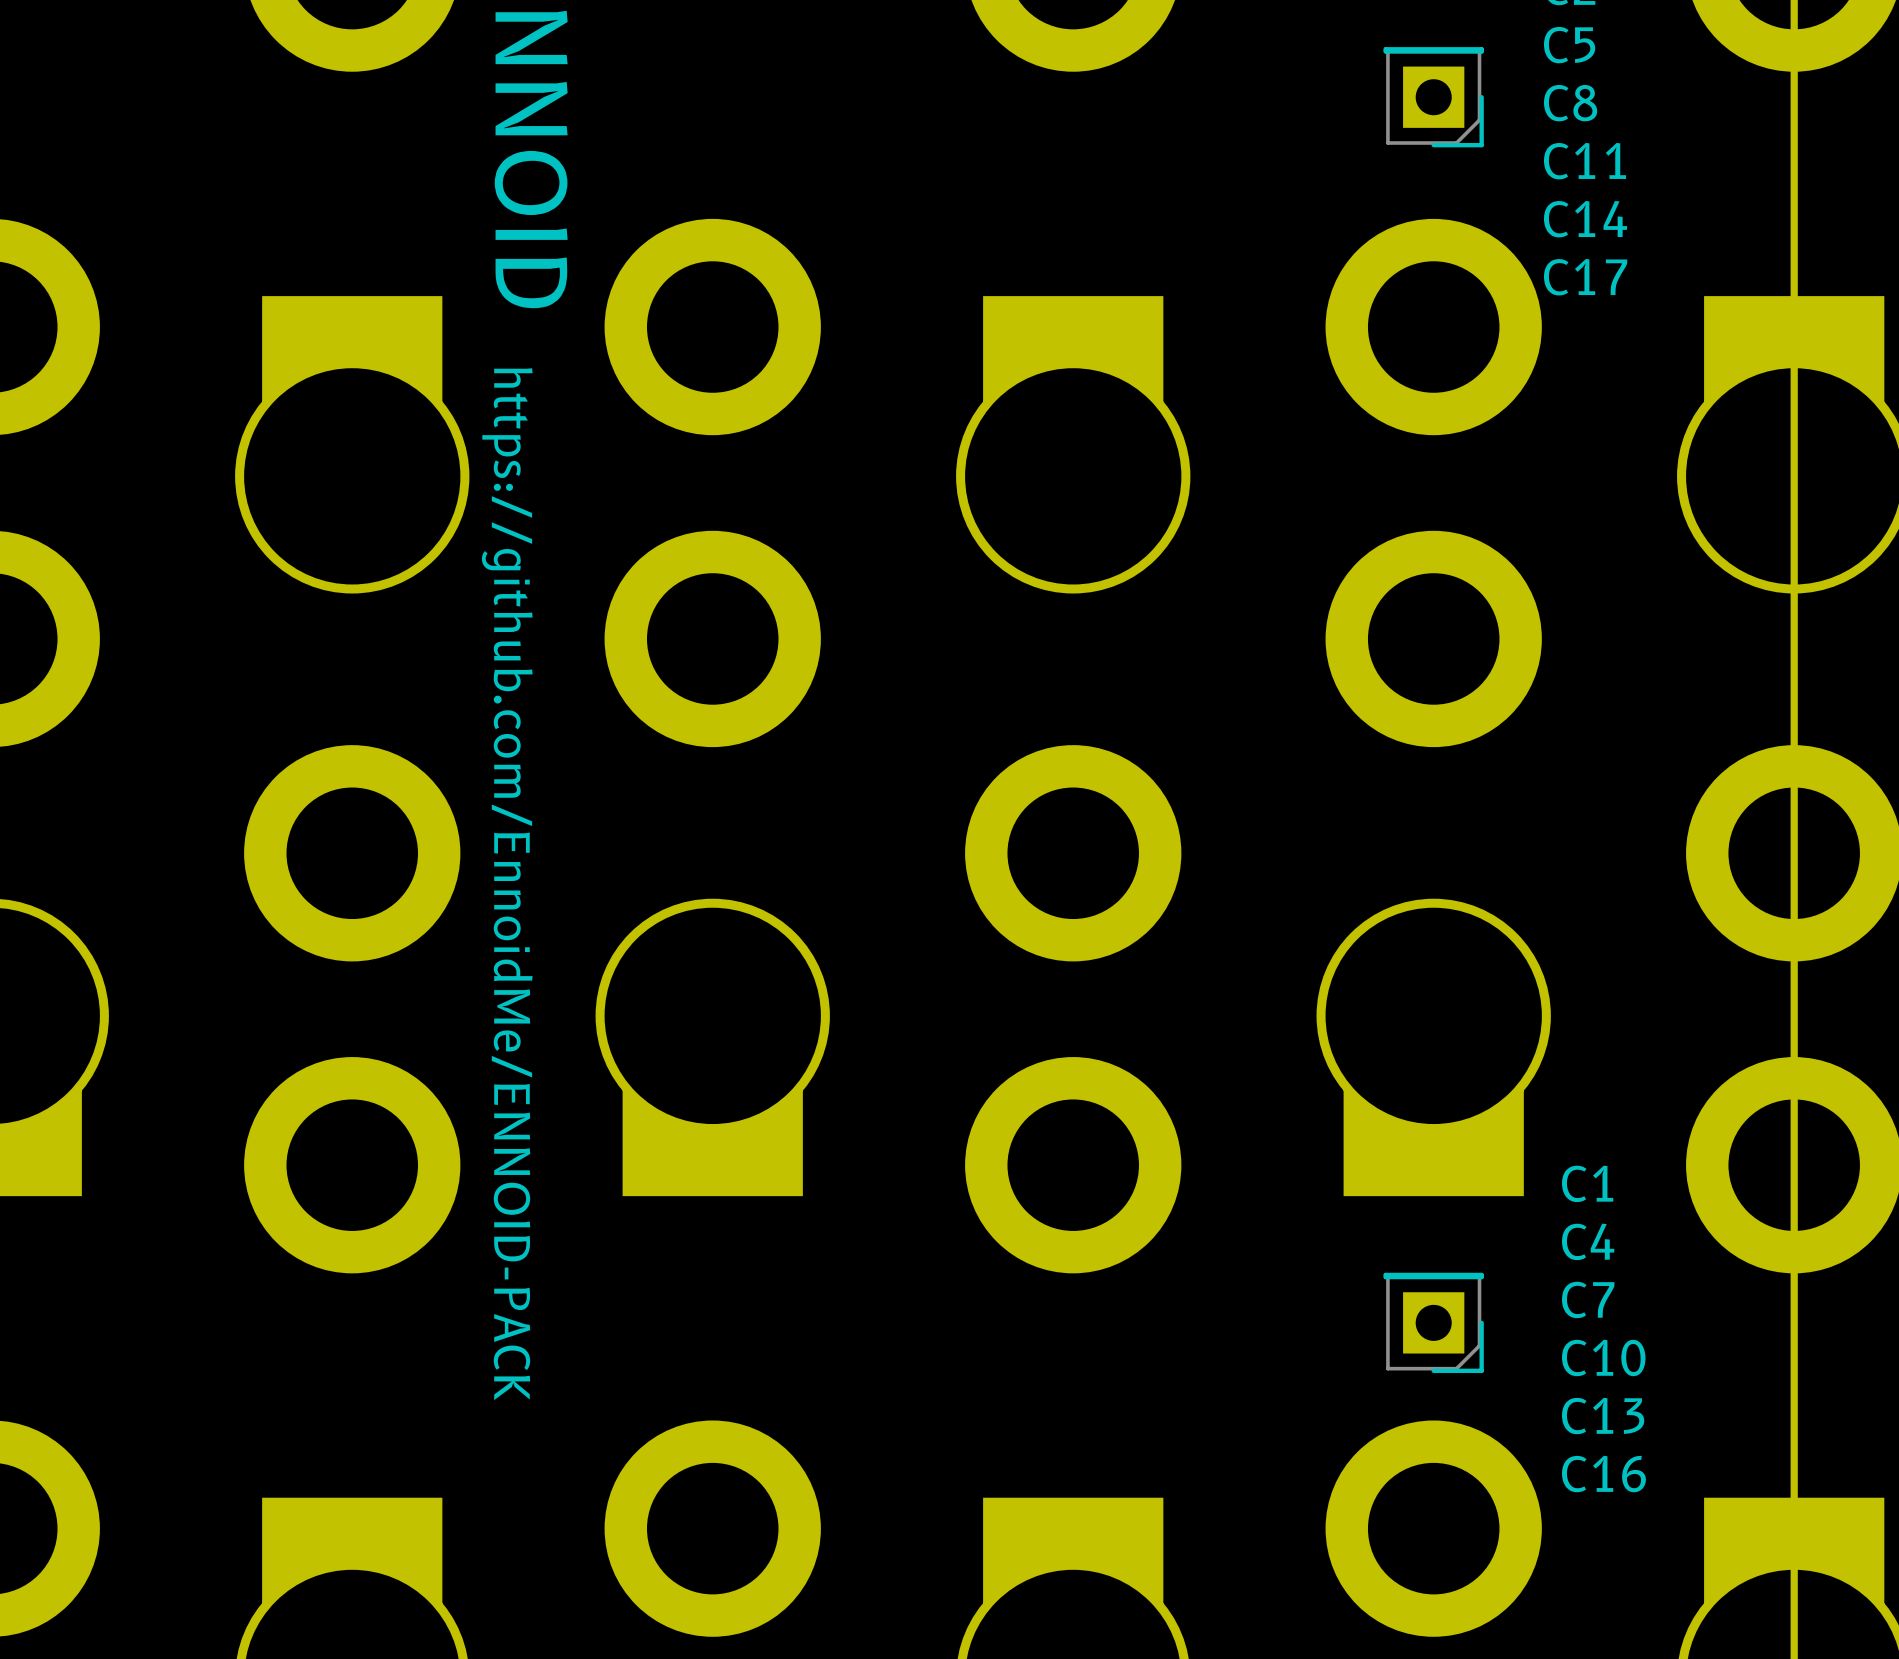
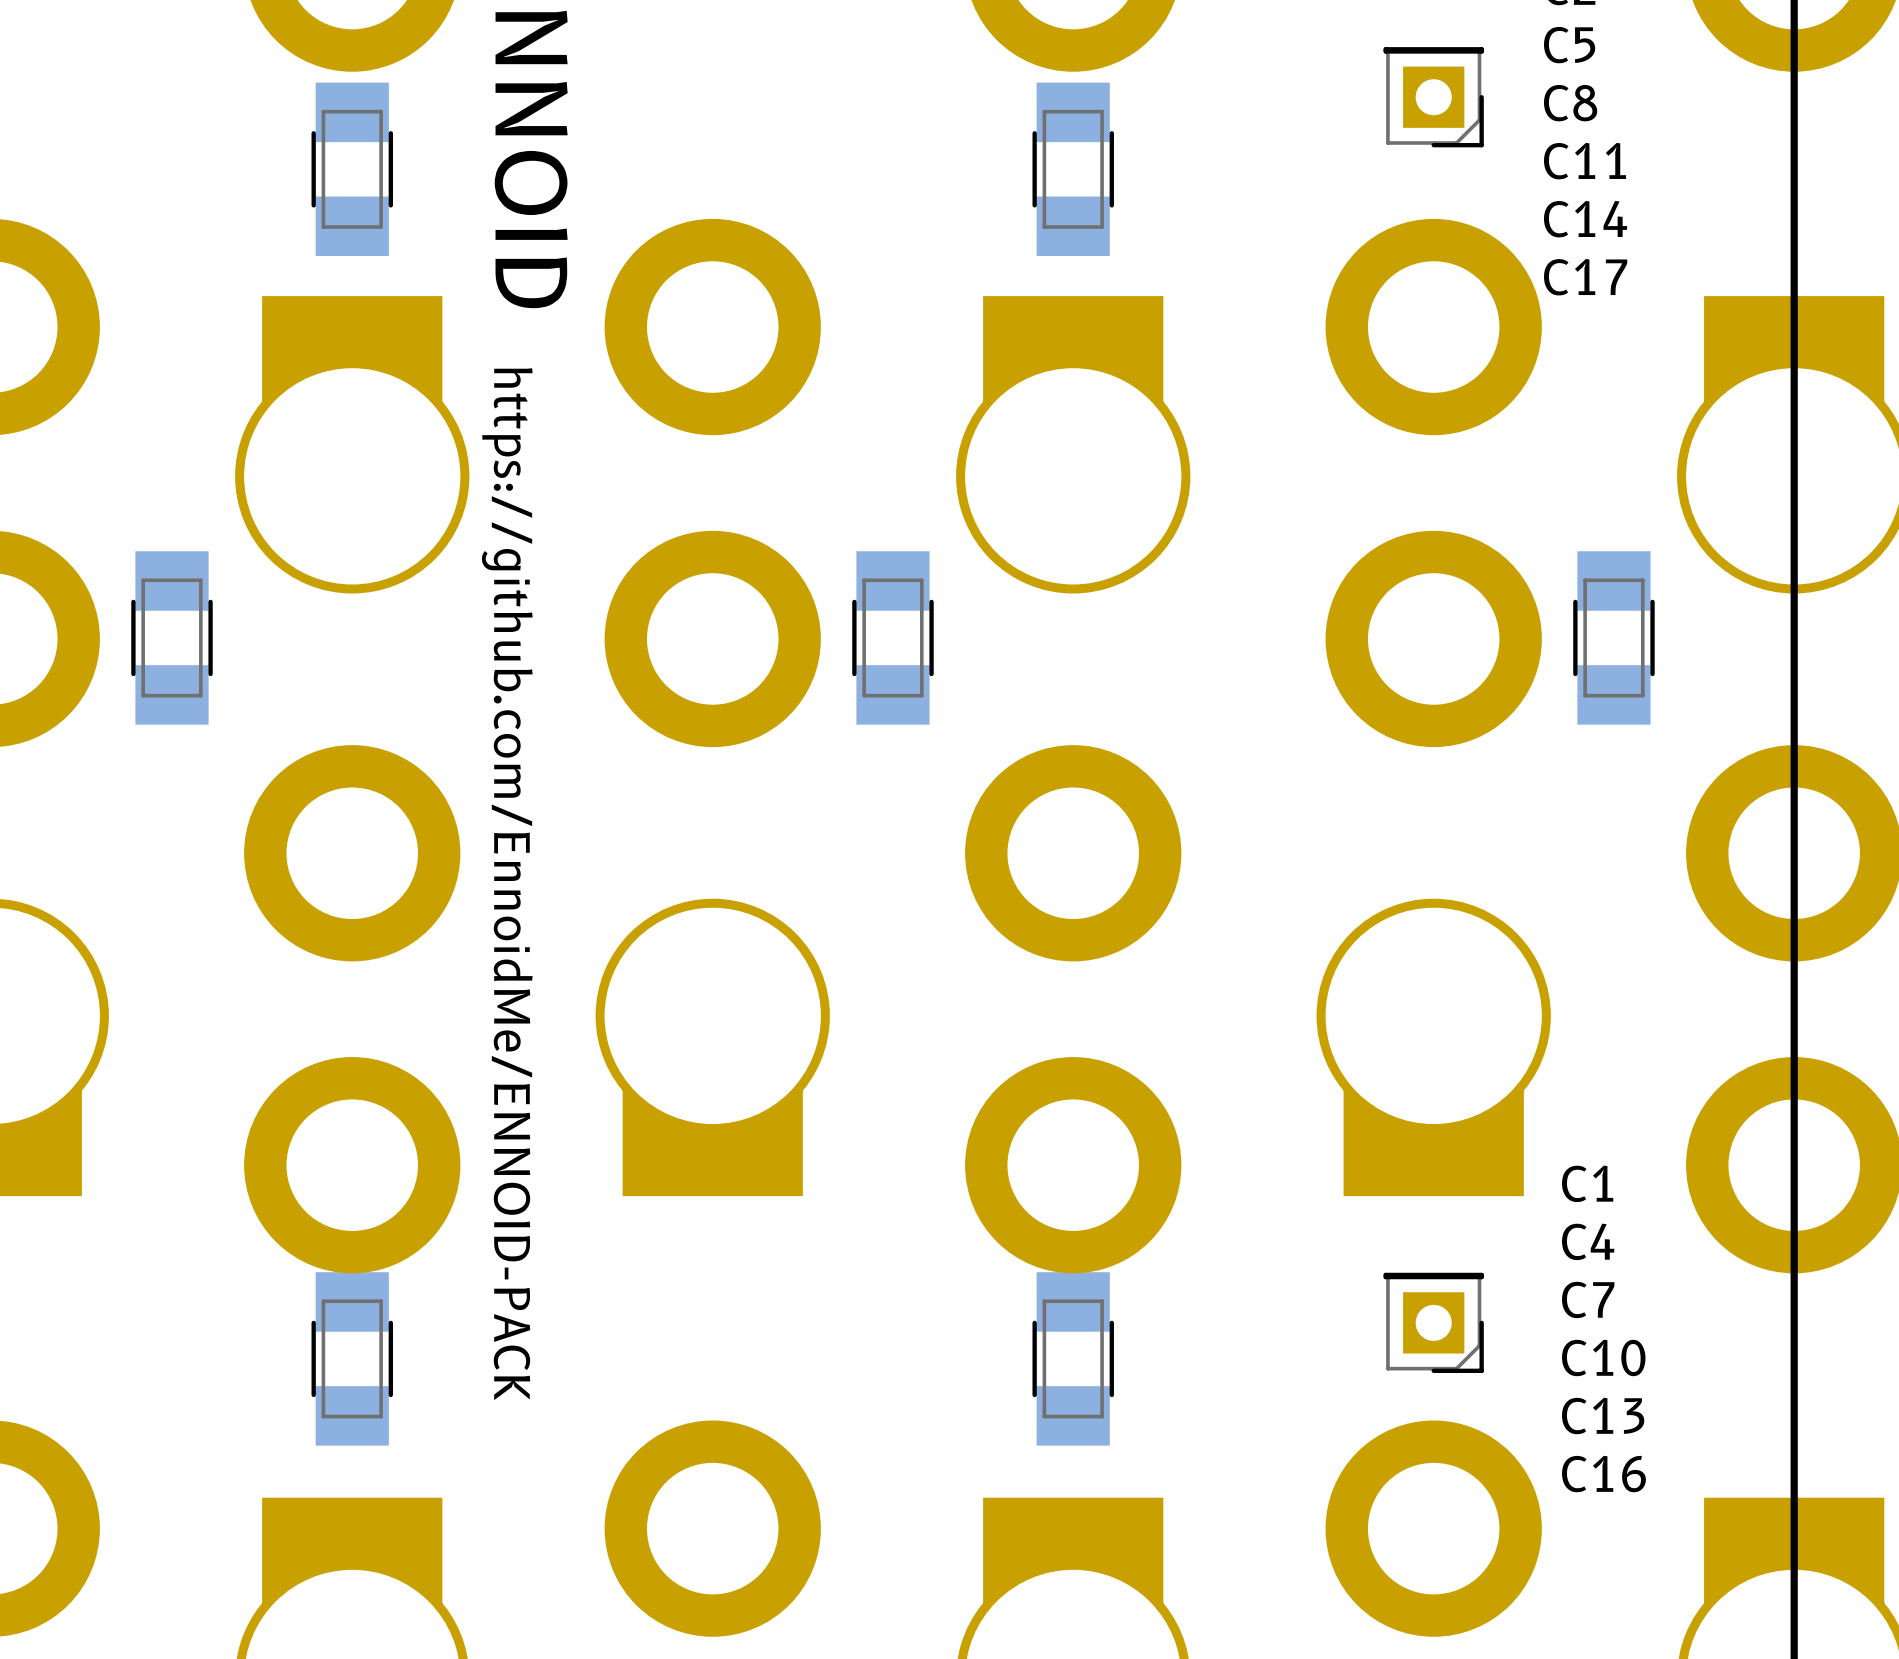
part: none -> (352, 169)
part: none -> (1073, 169)
part: none -> (172, 637)
part: none -> (892, 637)
part: none -> (1613, 637)
part: none -> (352, 1358)
part: none -> (1073, 1358)

